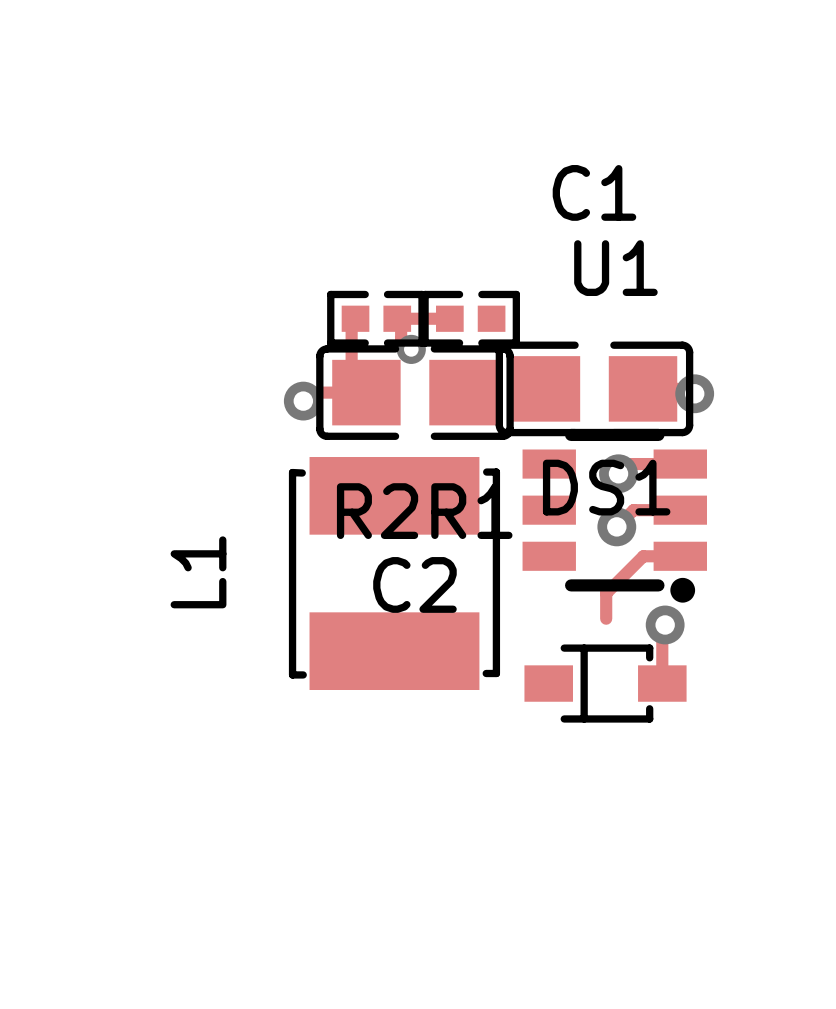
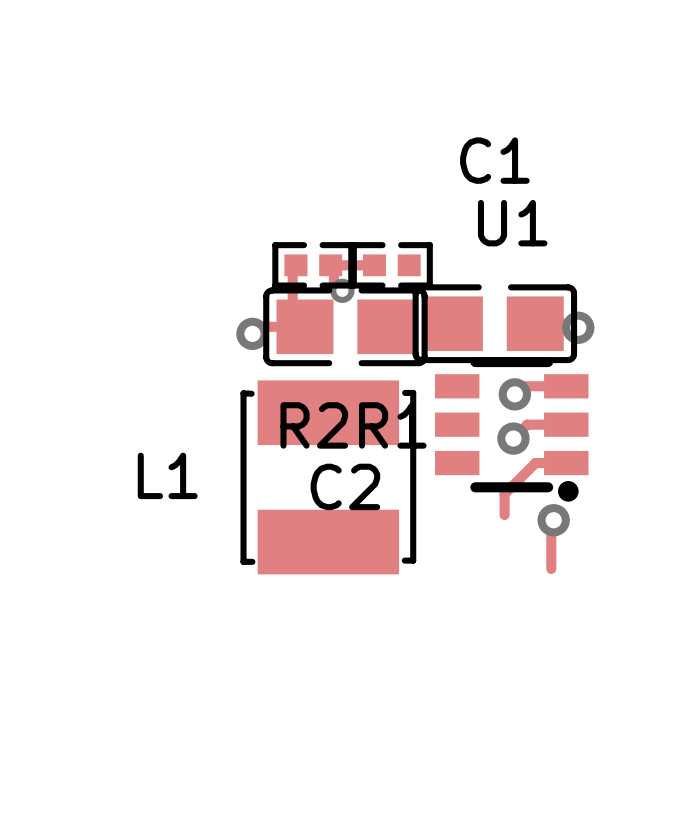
L1 name rotation: 0° (198, 572) -> 90° clockwise (167, 475)
DS1: (605, 683) -> none

